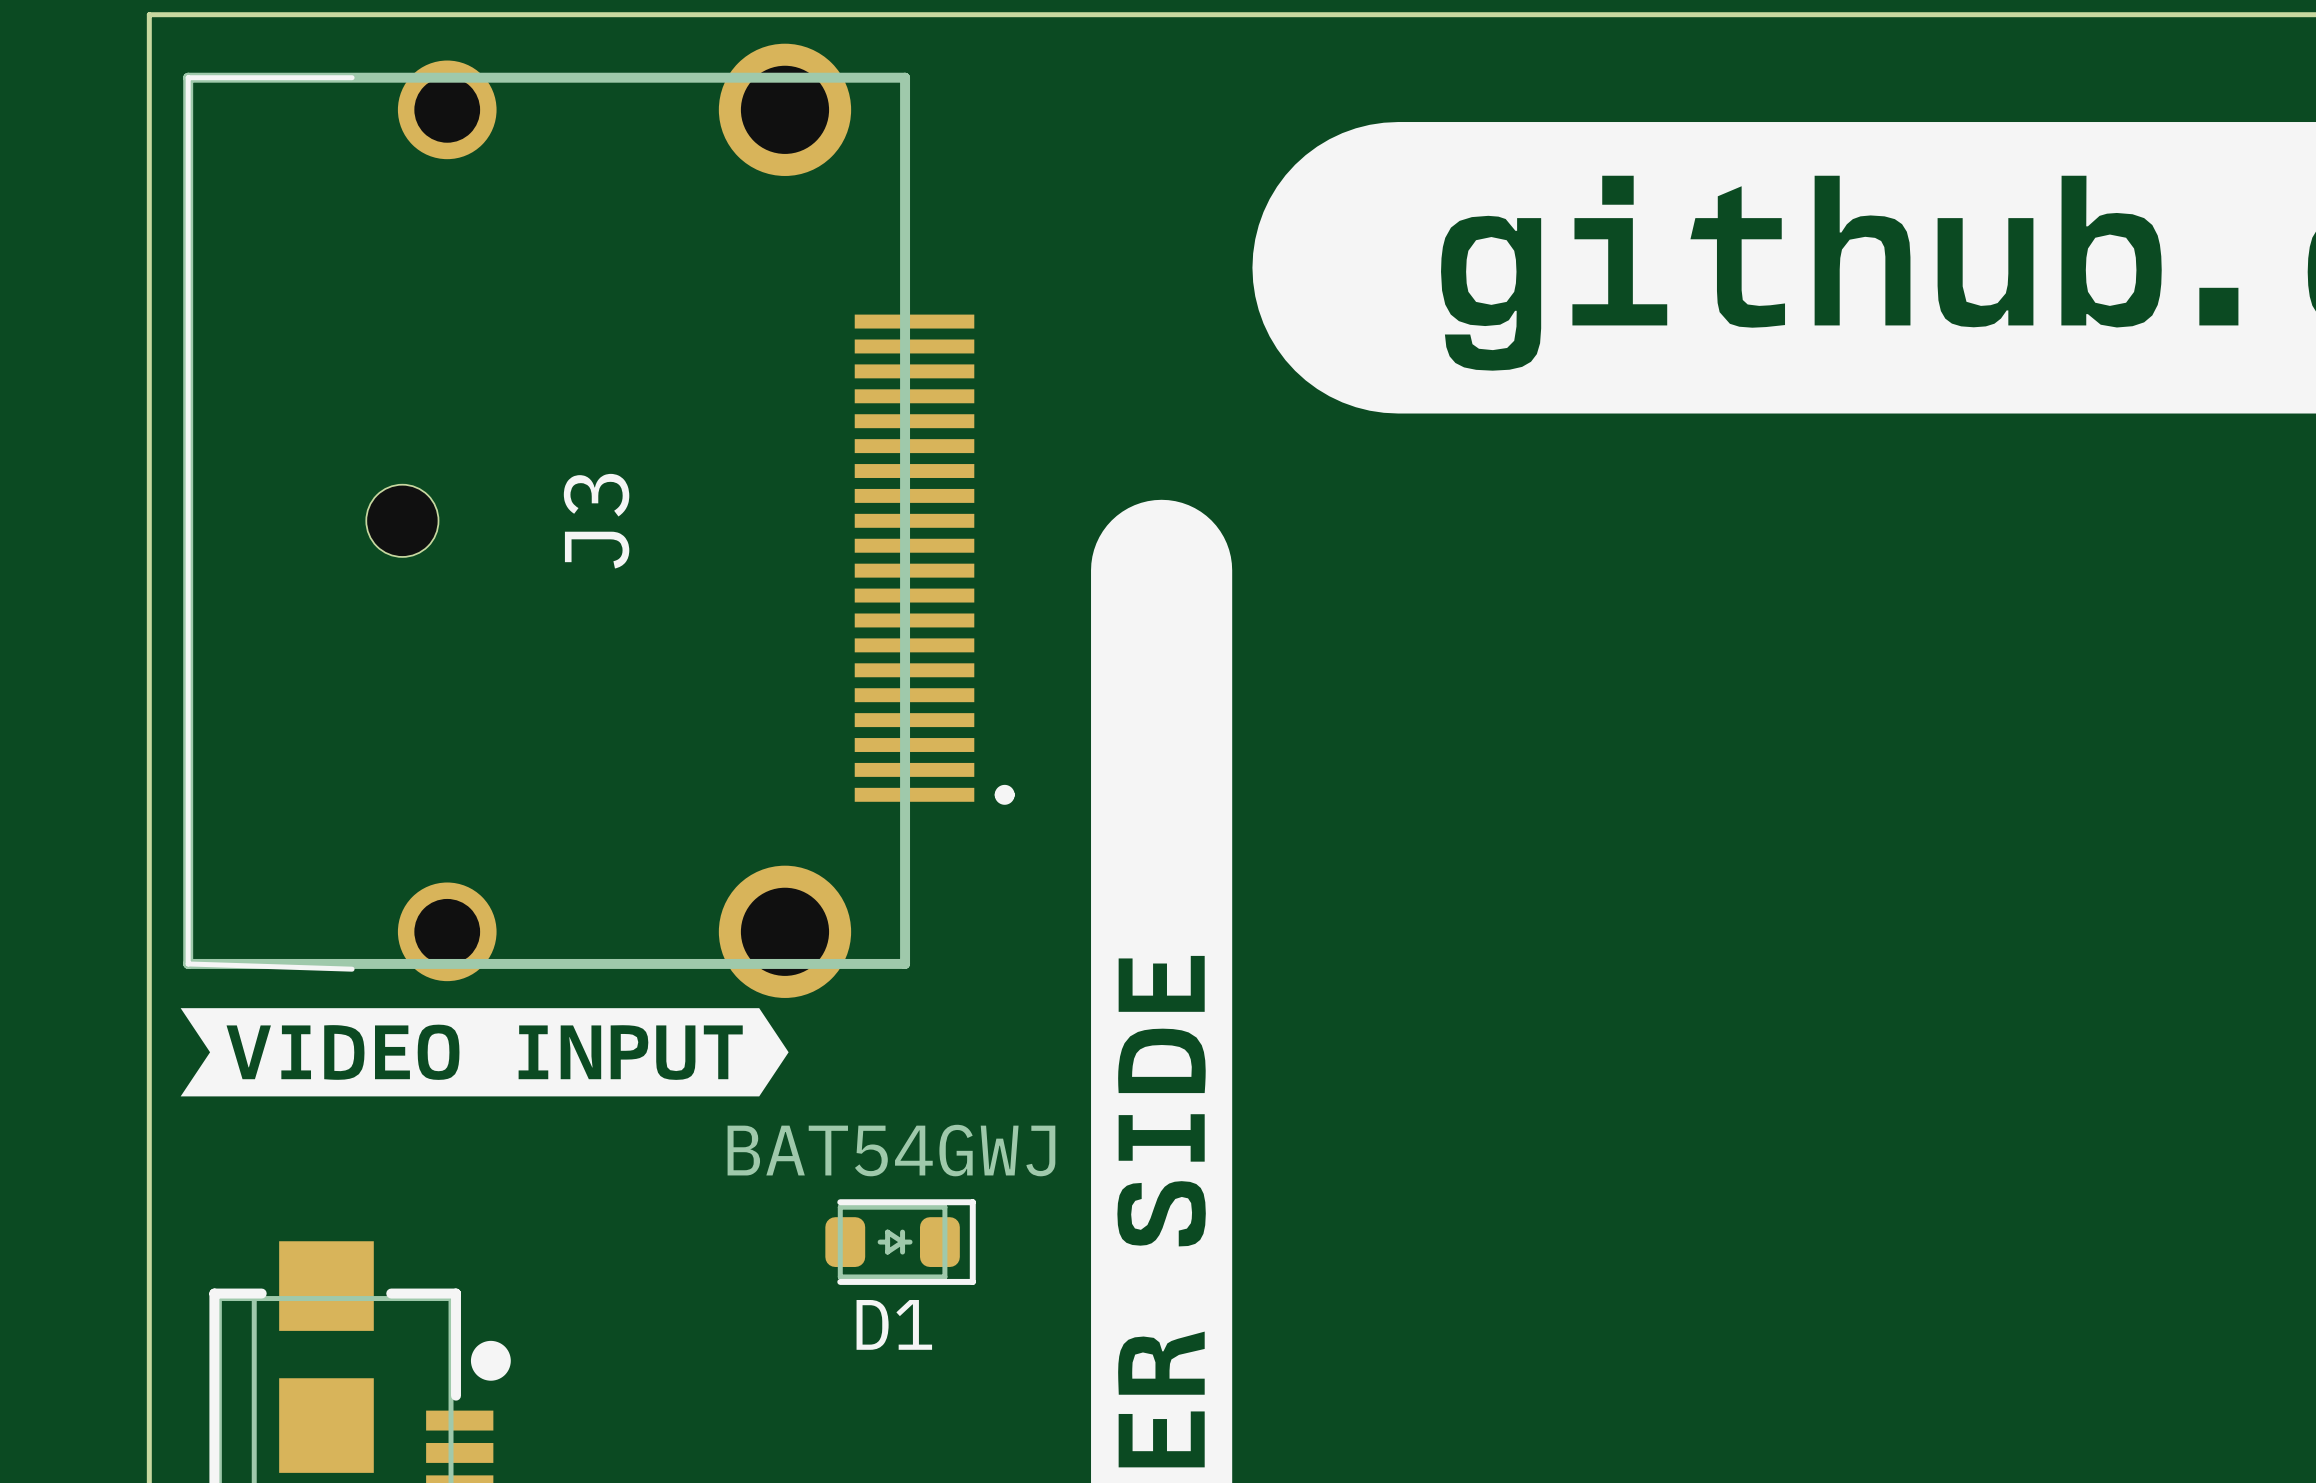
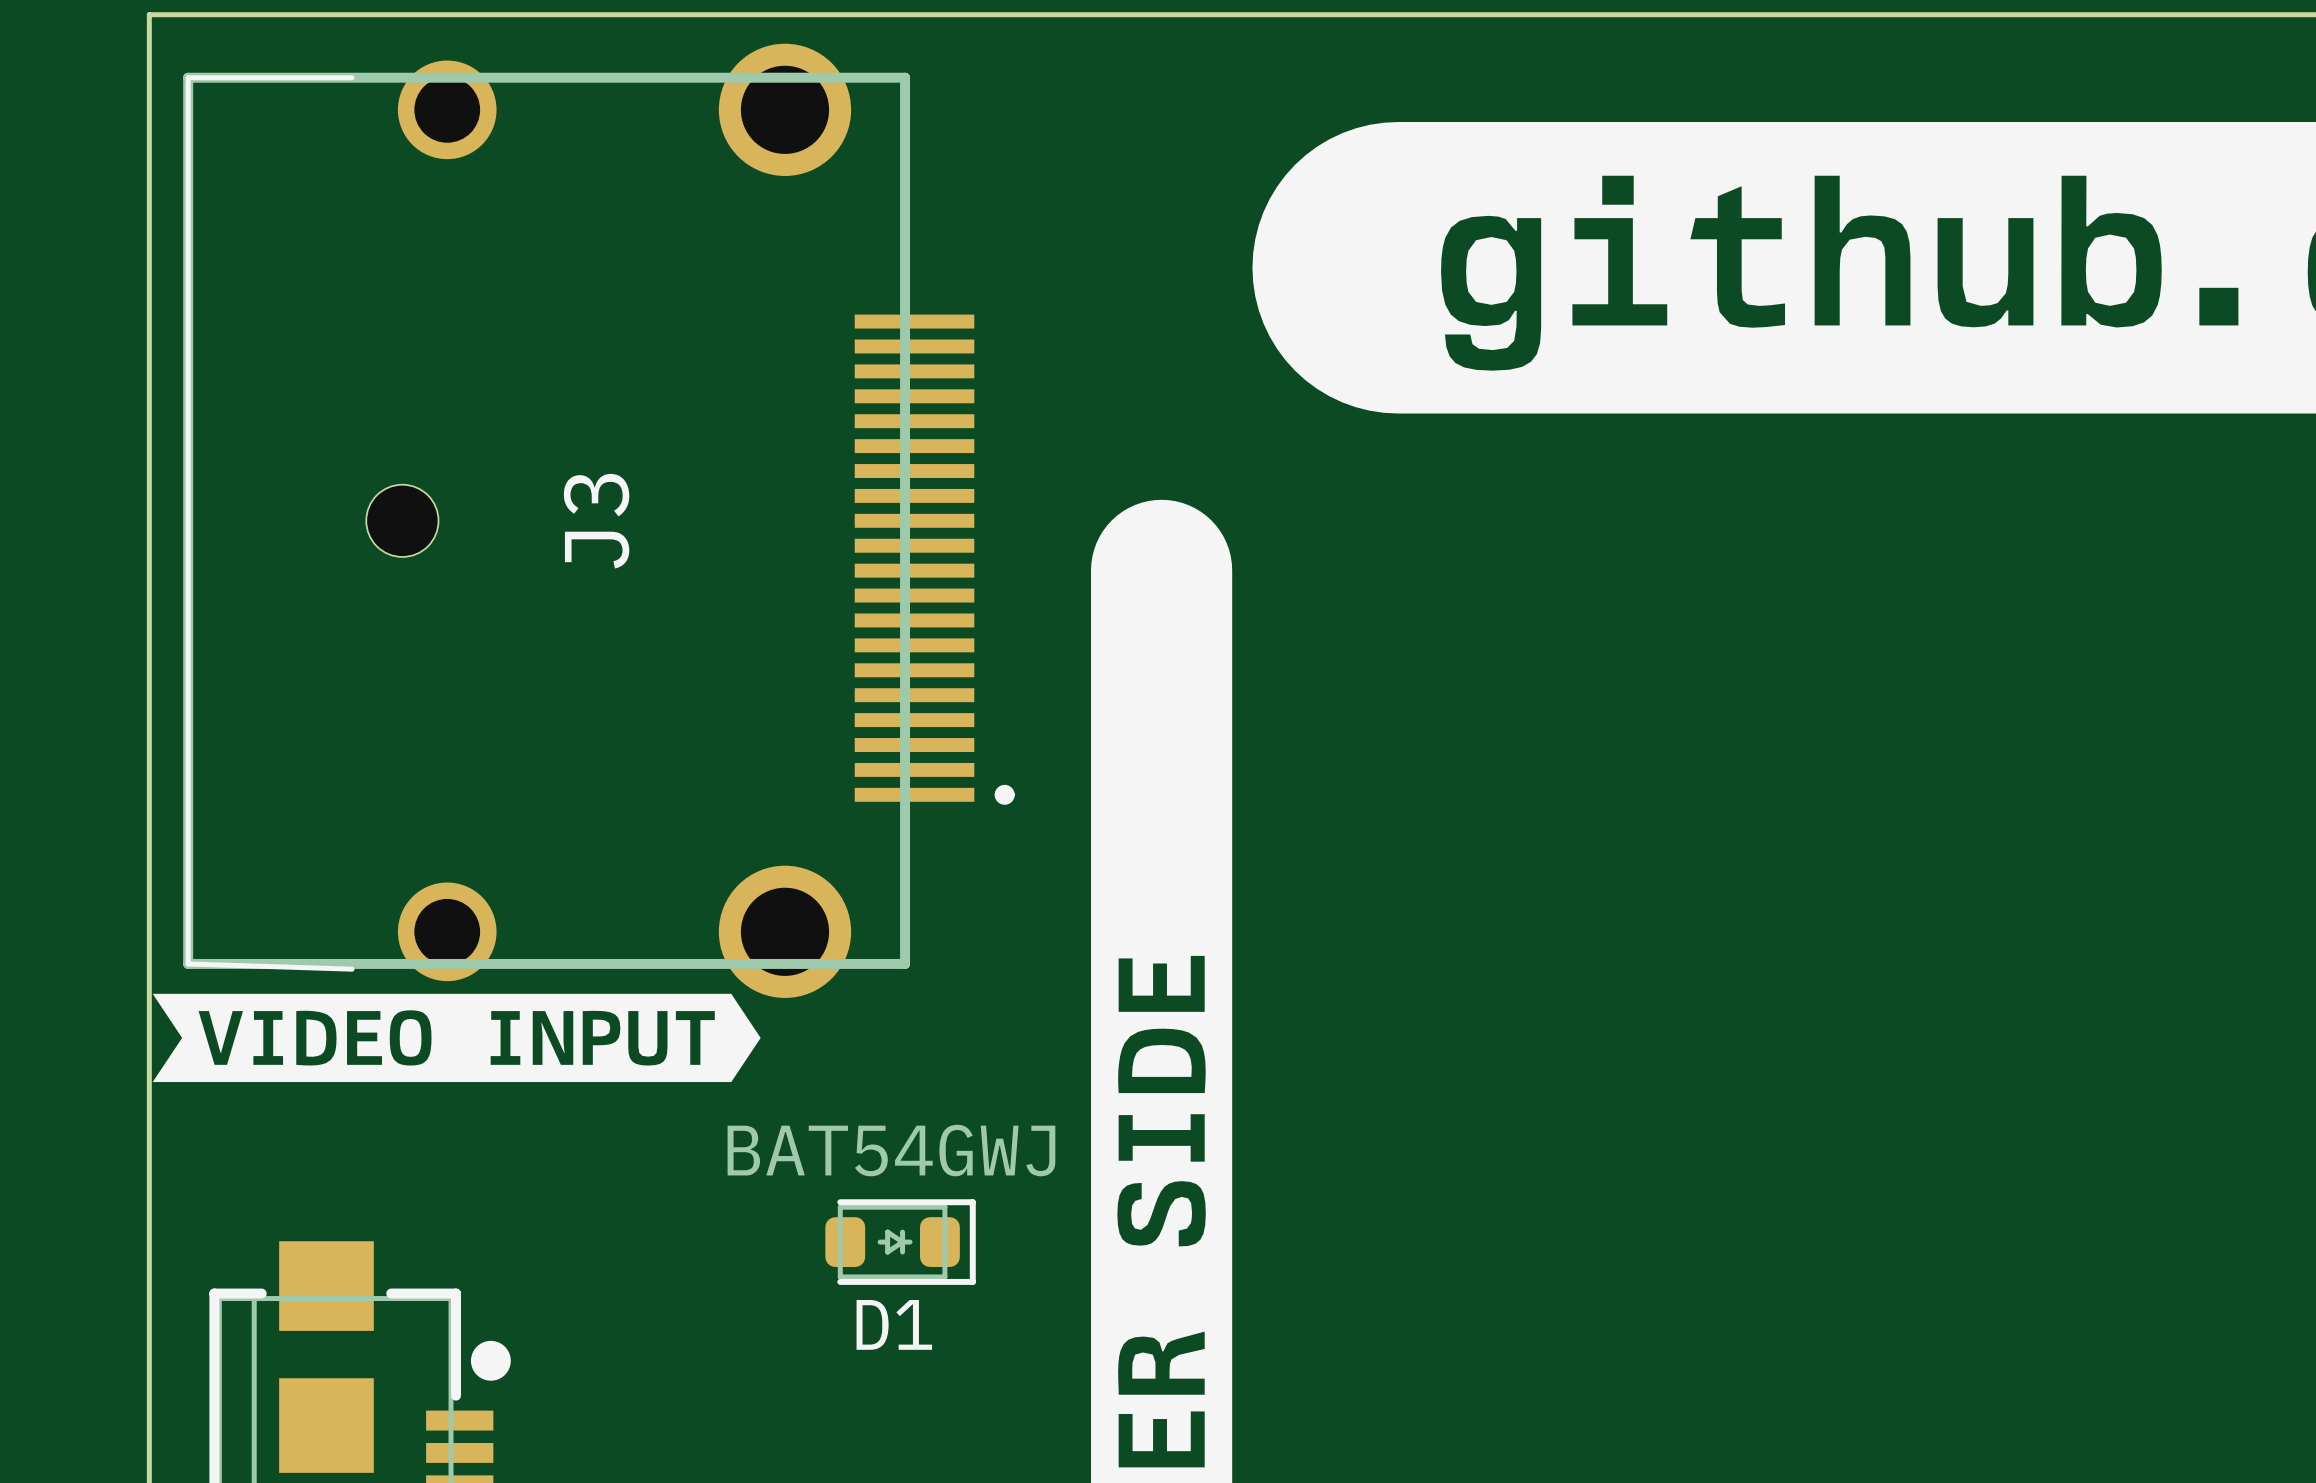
drawing position: (484, 1052) -> (456, 1037)

